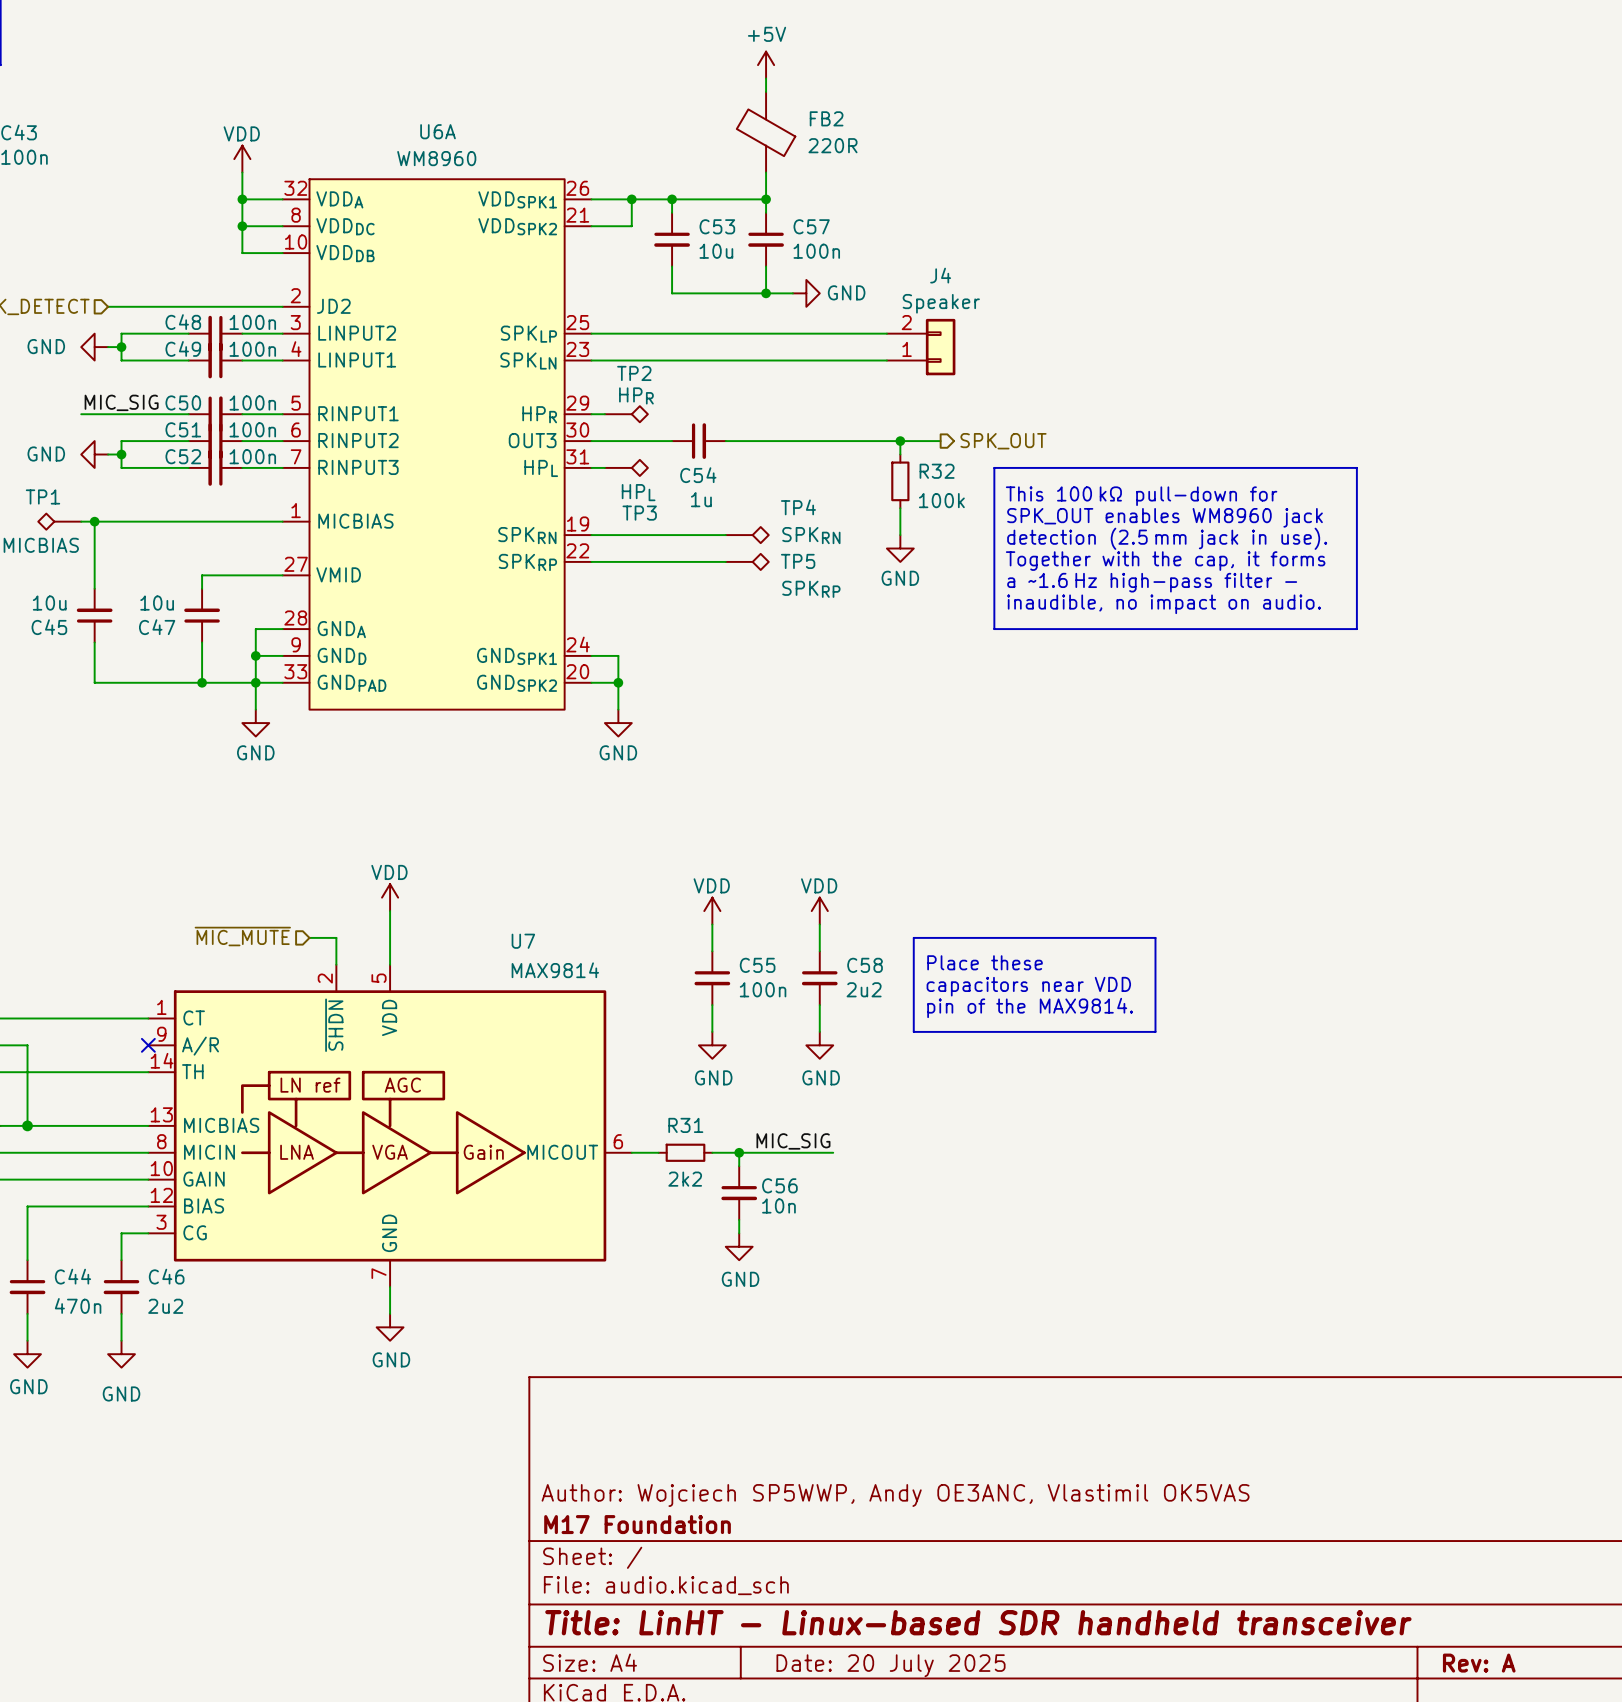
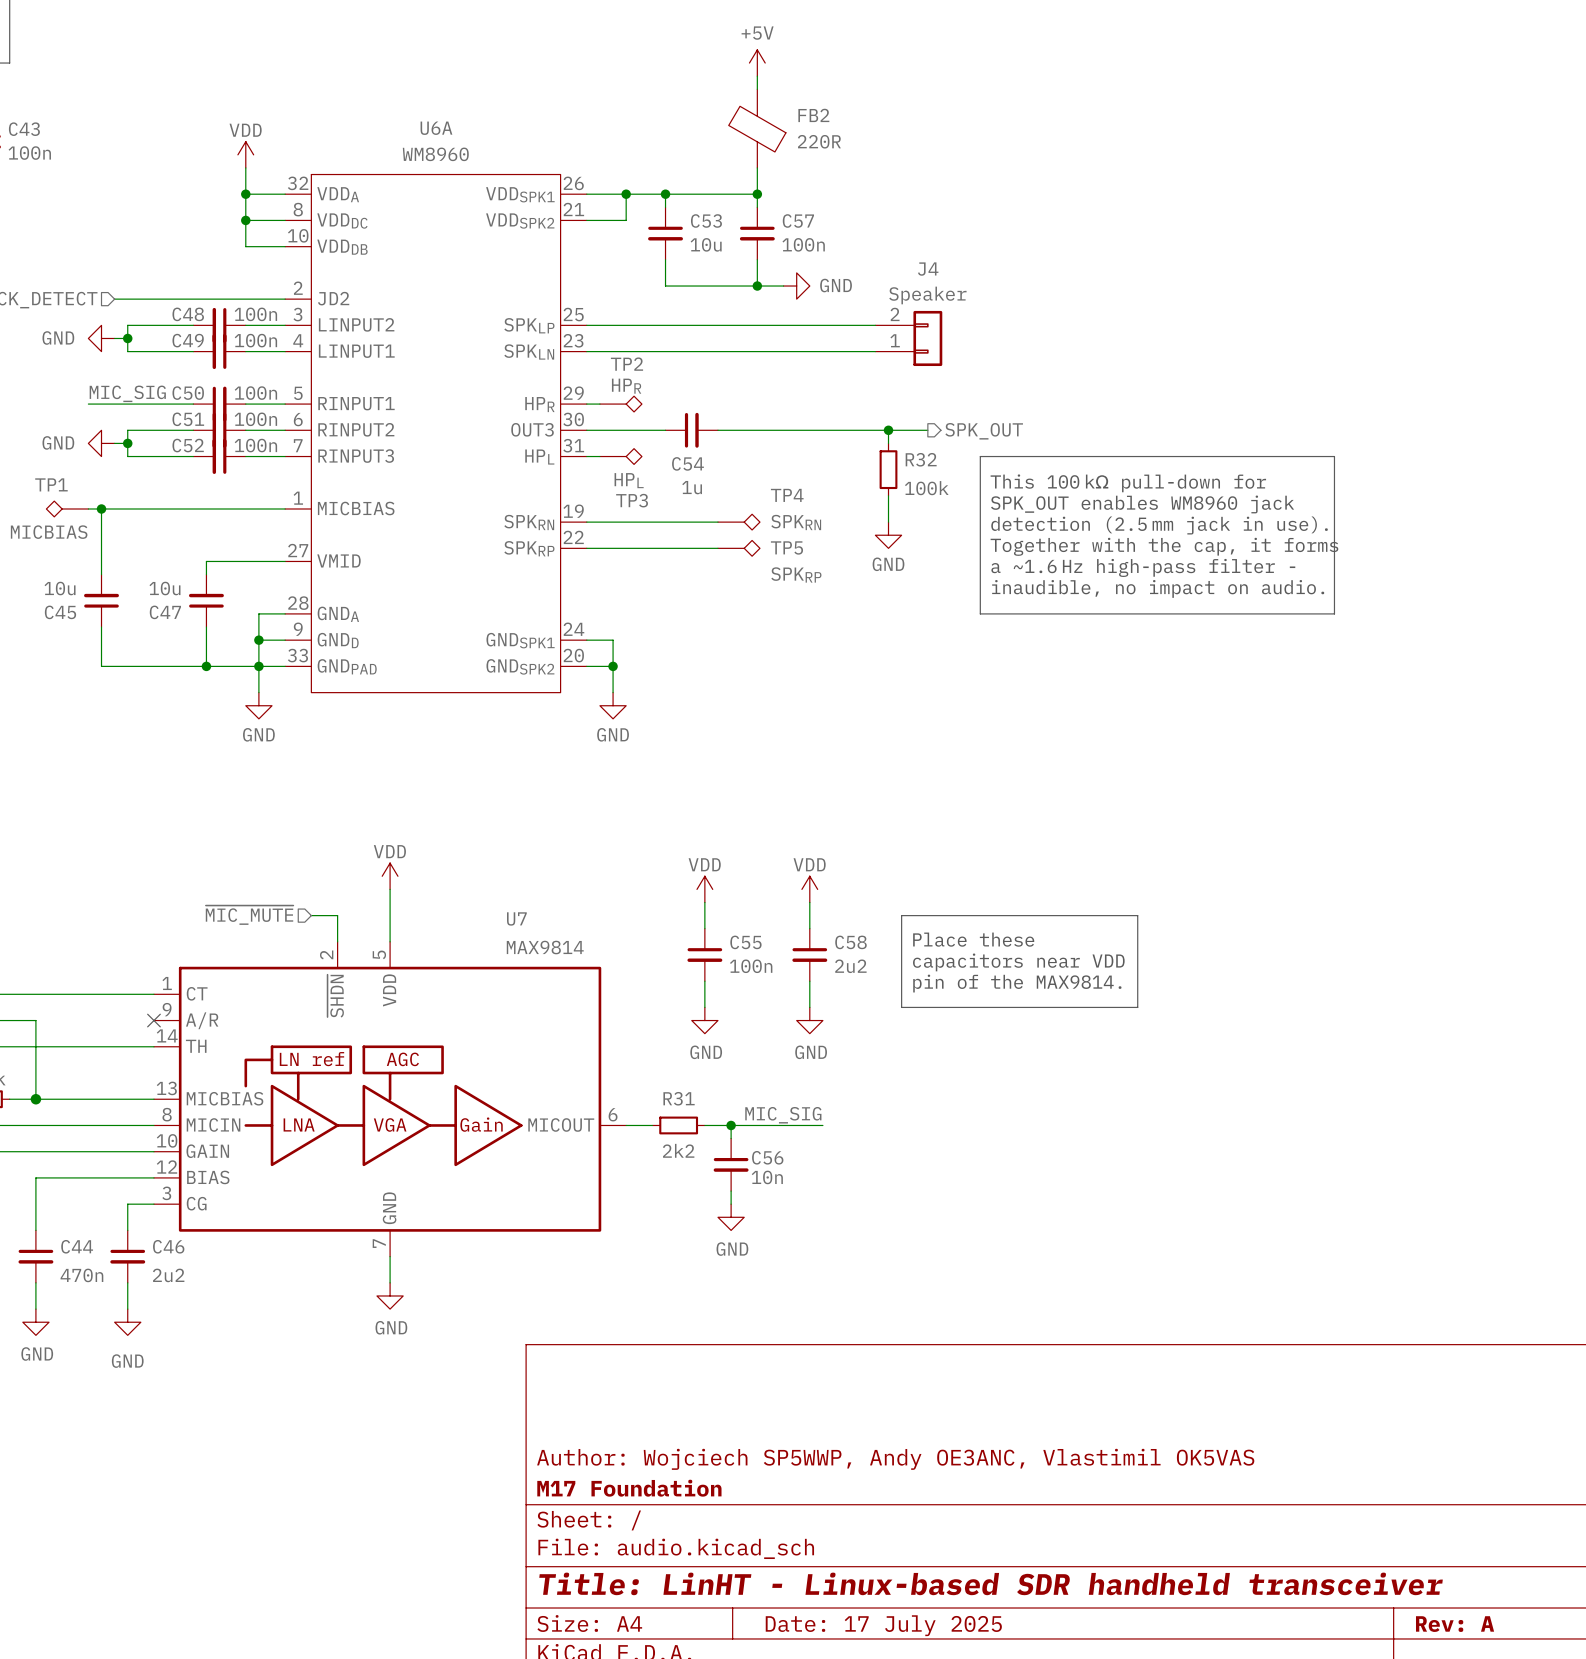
title block: Date: 20 July 2025 (891, 1665) -> Date: 17 July 2025 (883, 1625)

